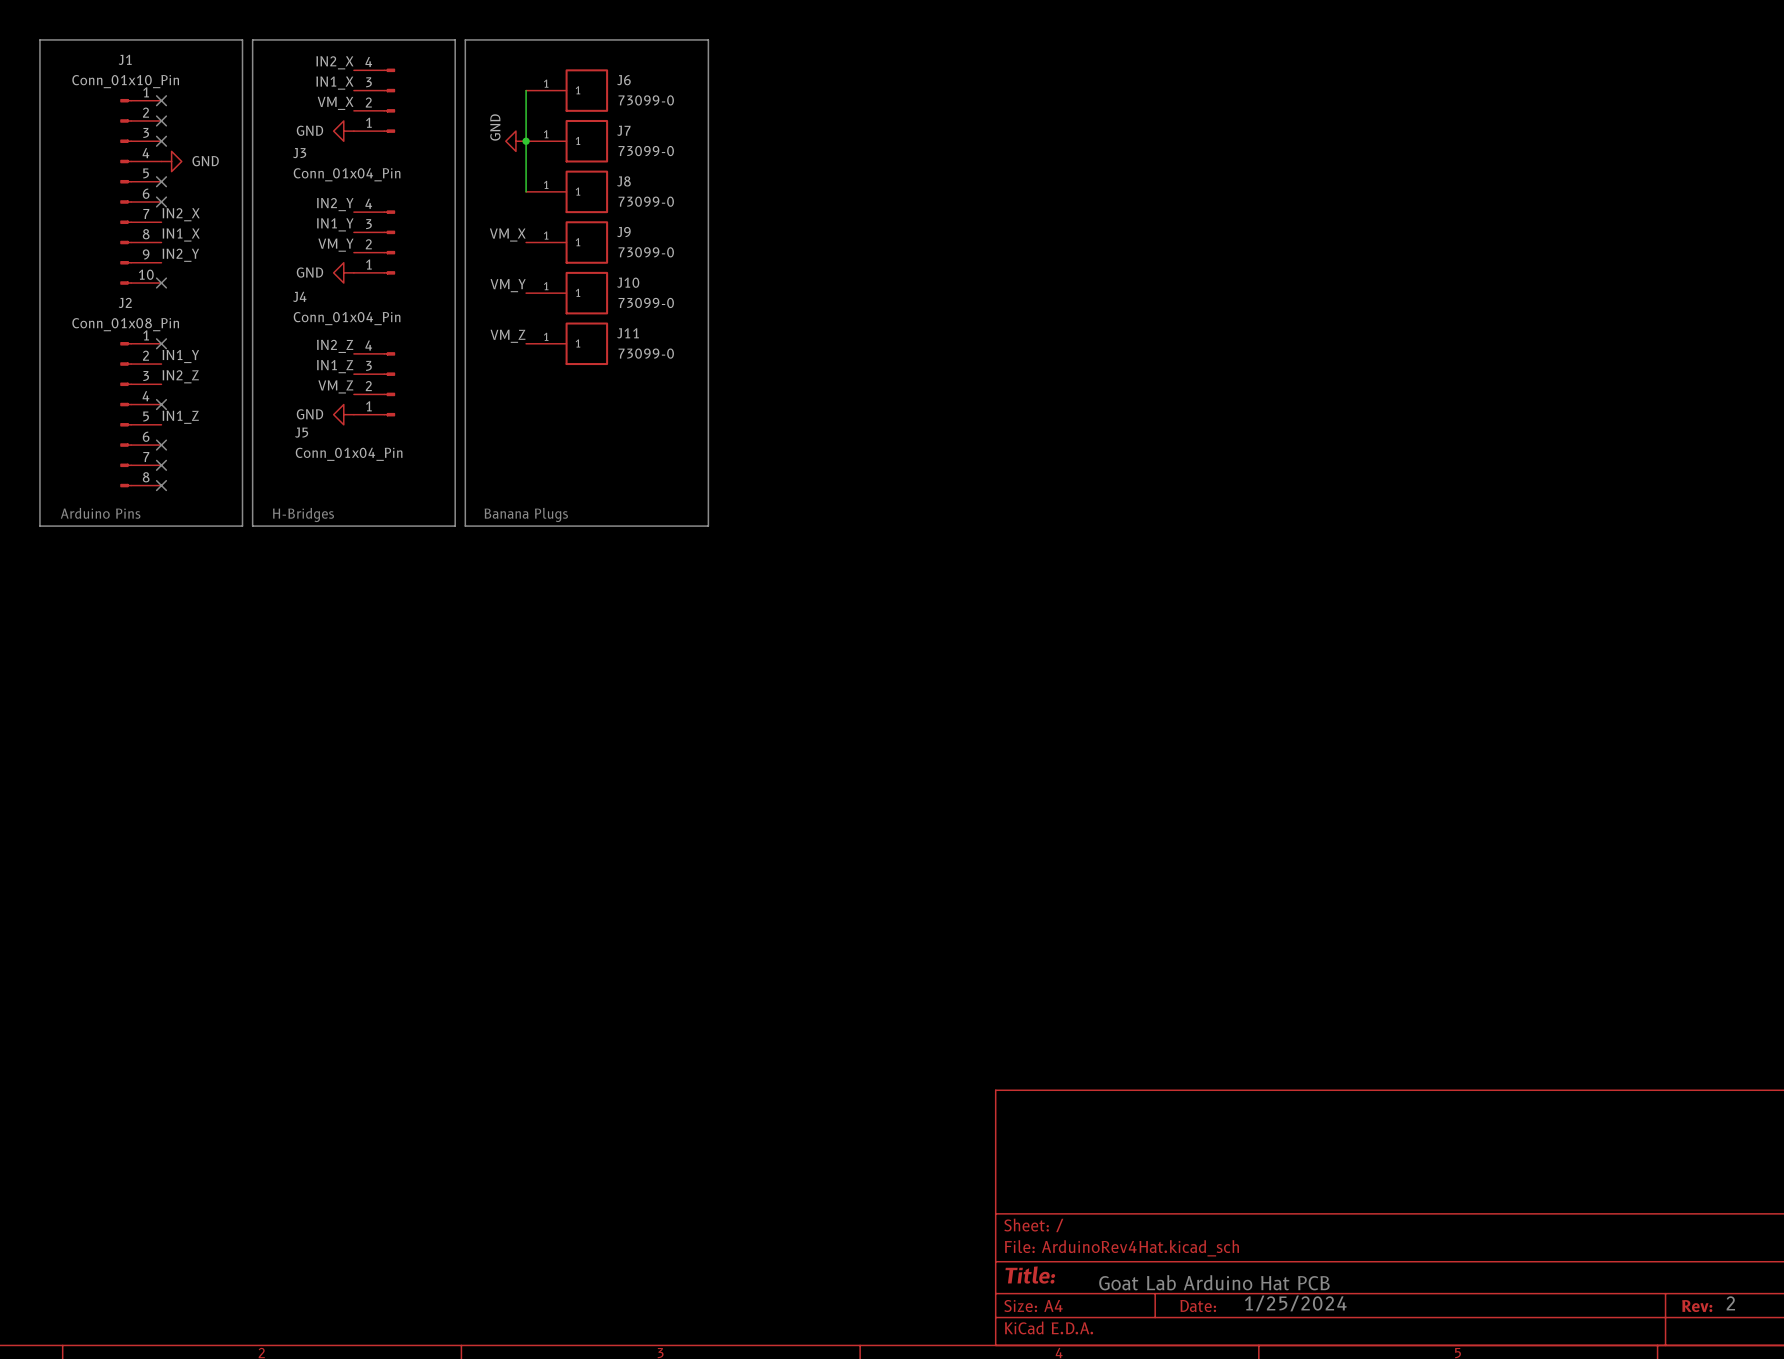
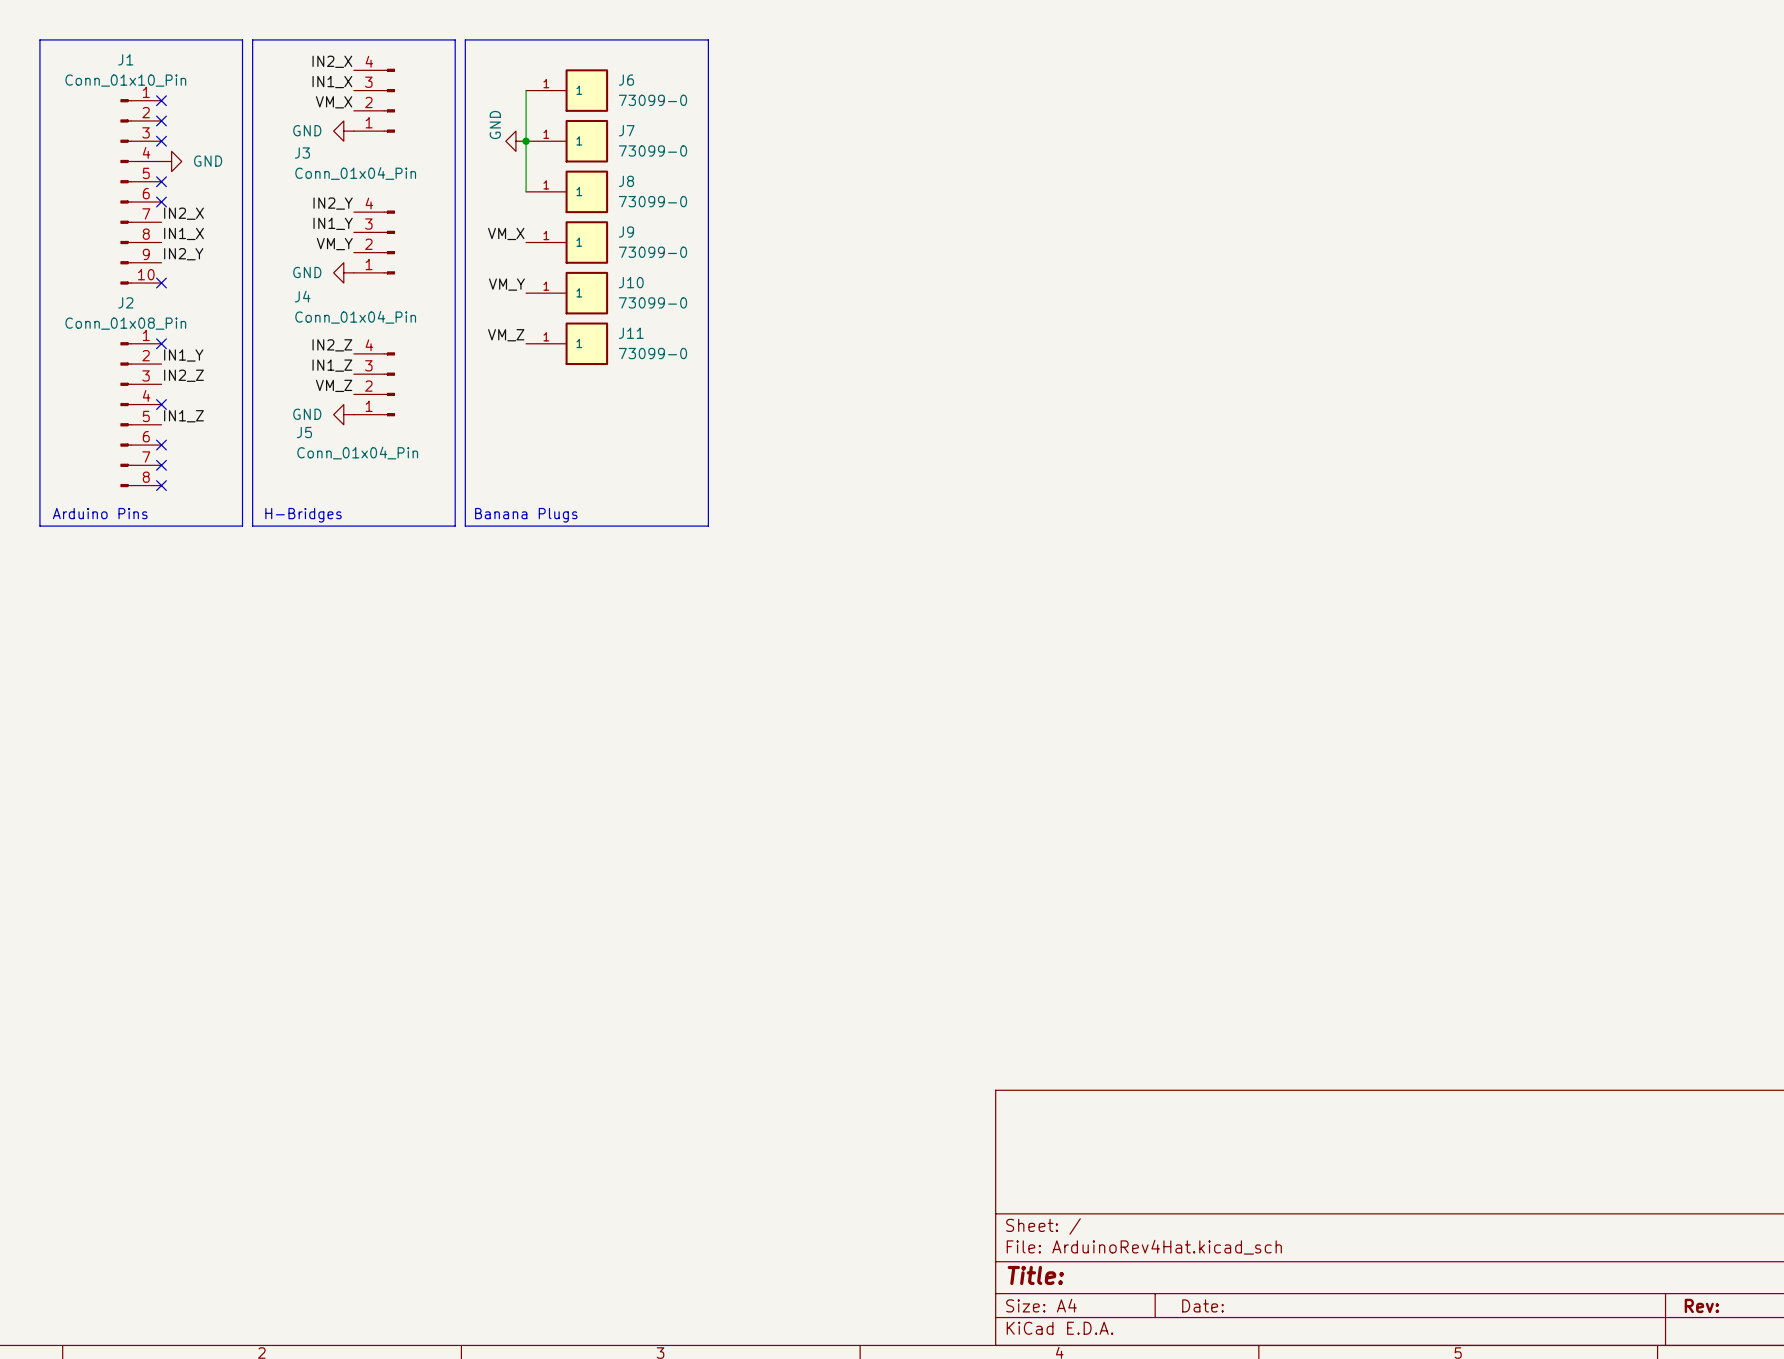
text: Goat Lab Arduino Hat PCB (1214, 1282) -> none
text: 1/25/2024 (1295, 1303) -> none
text: 2 (1730, 1303) -> none

